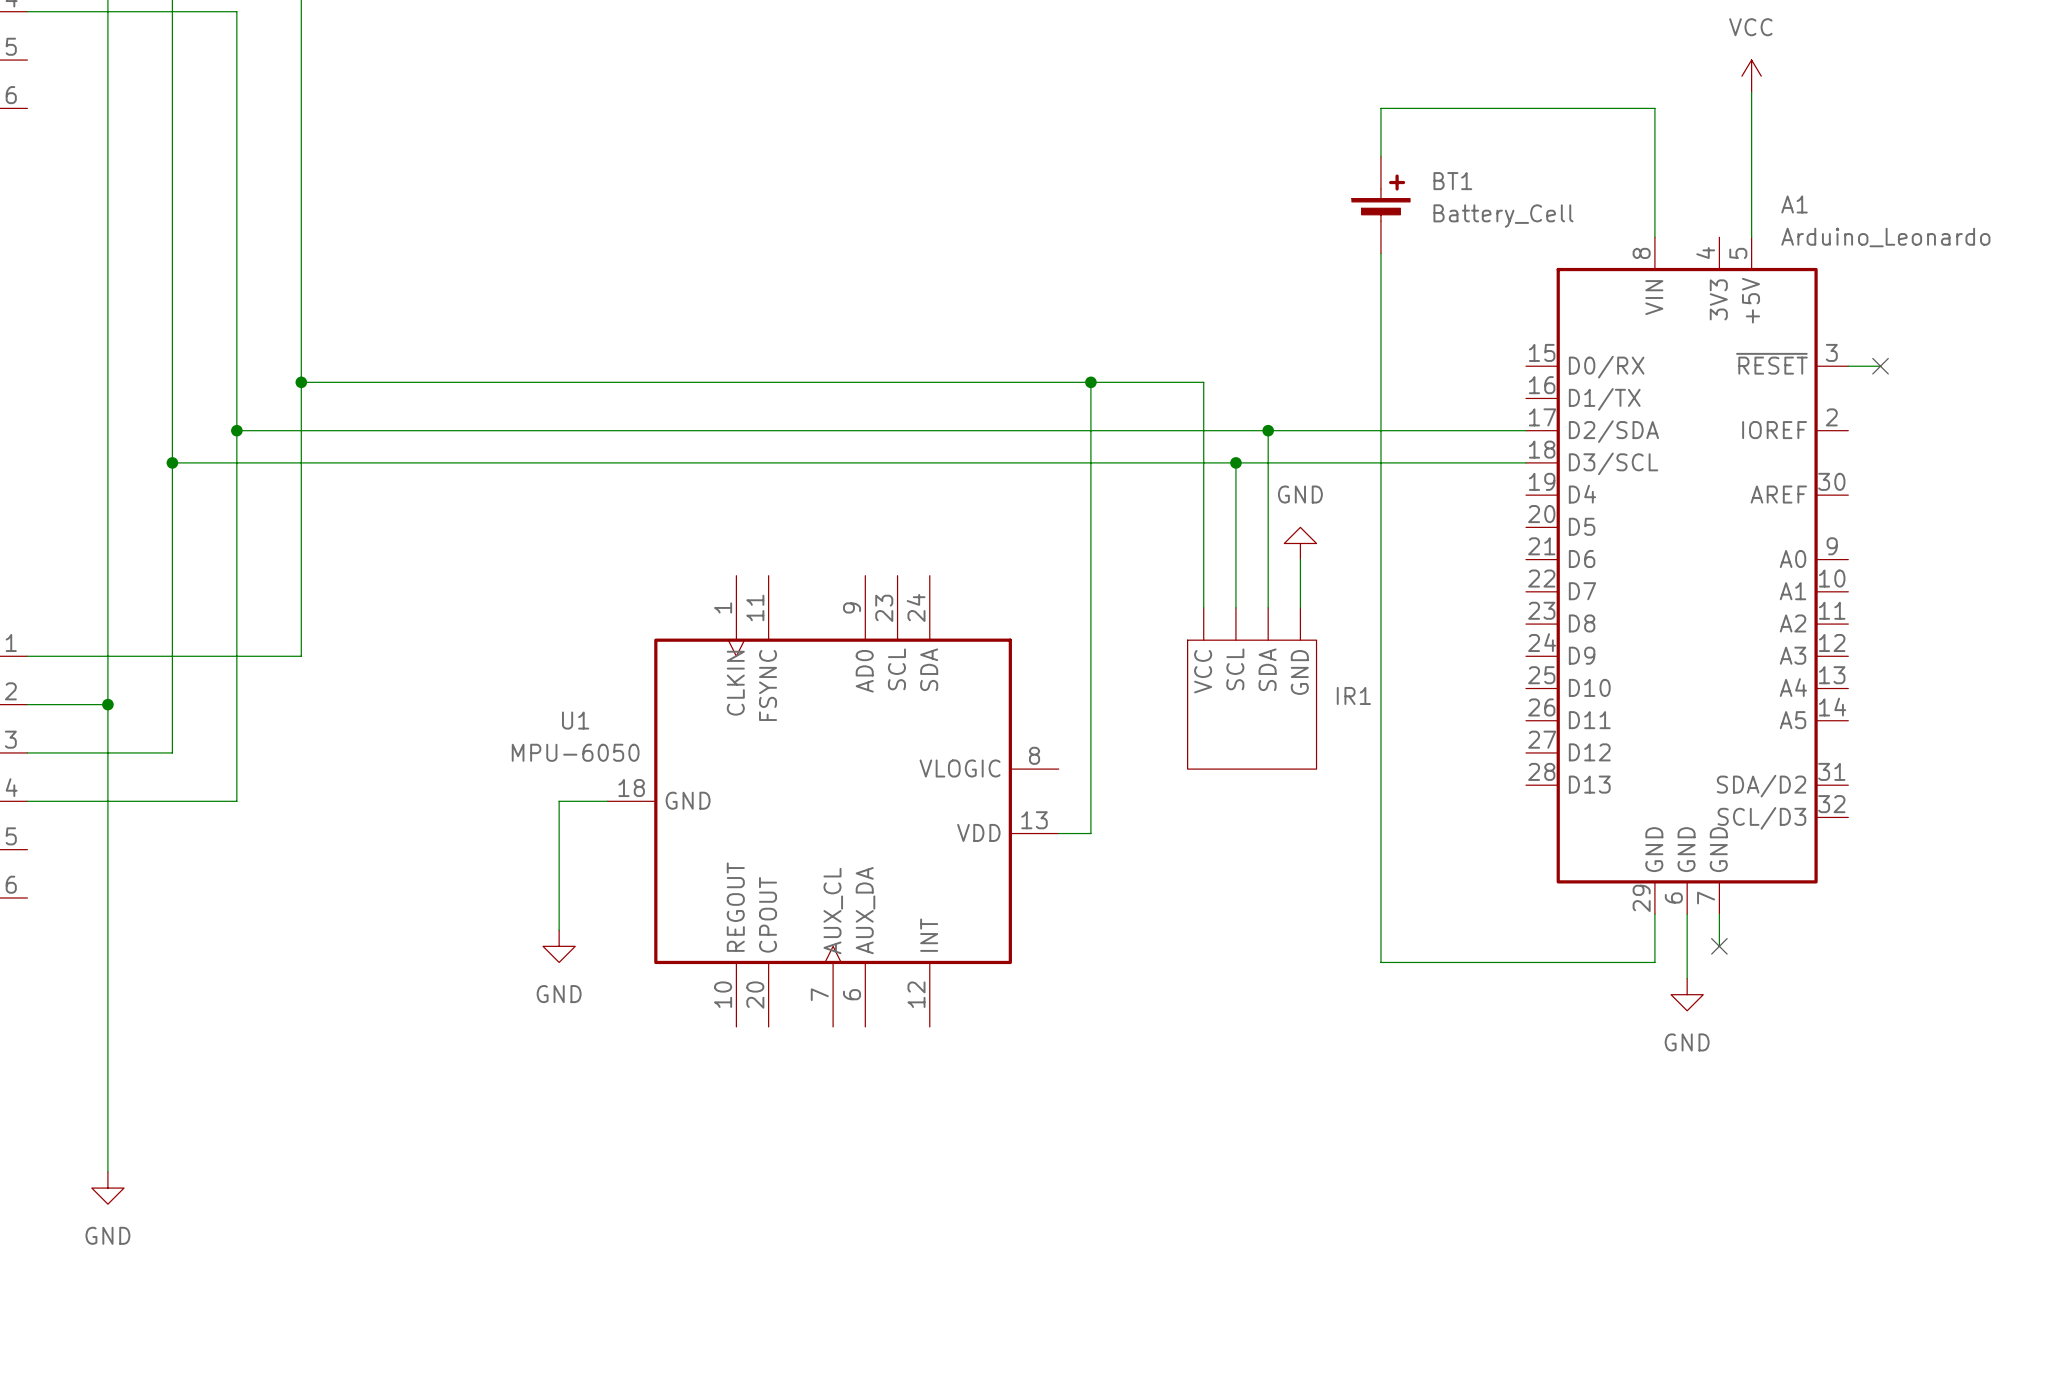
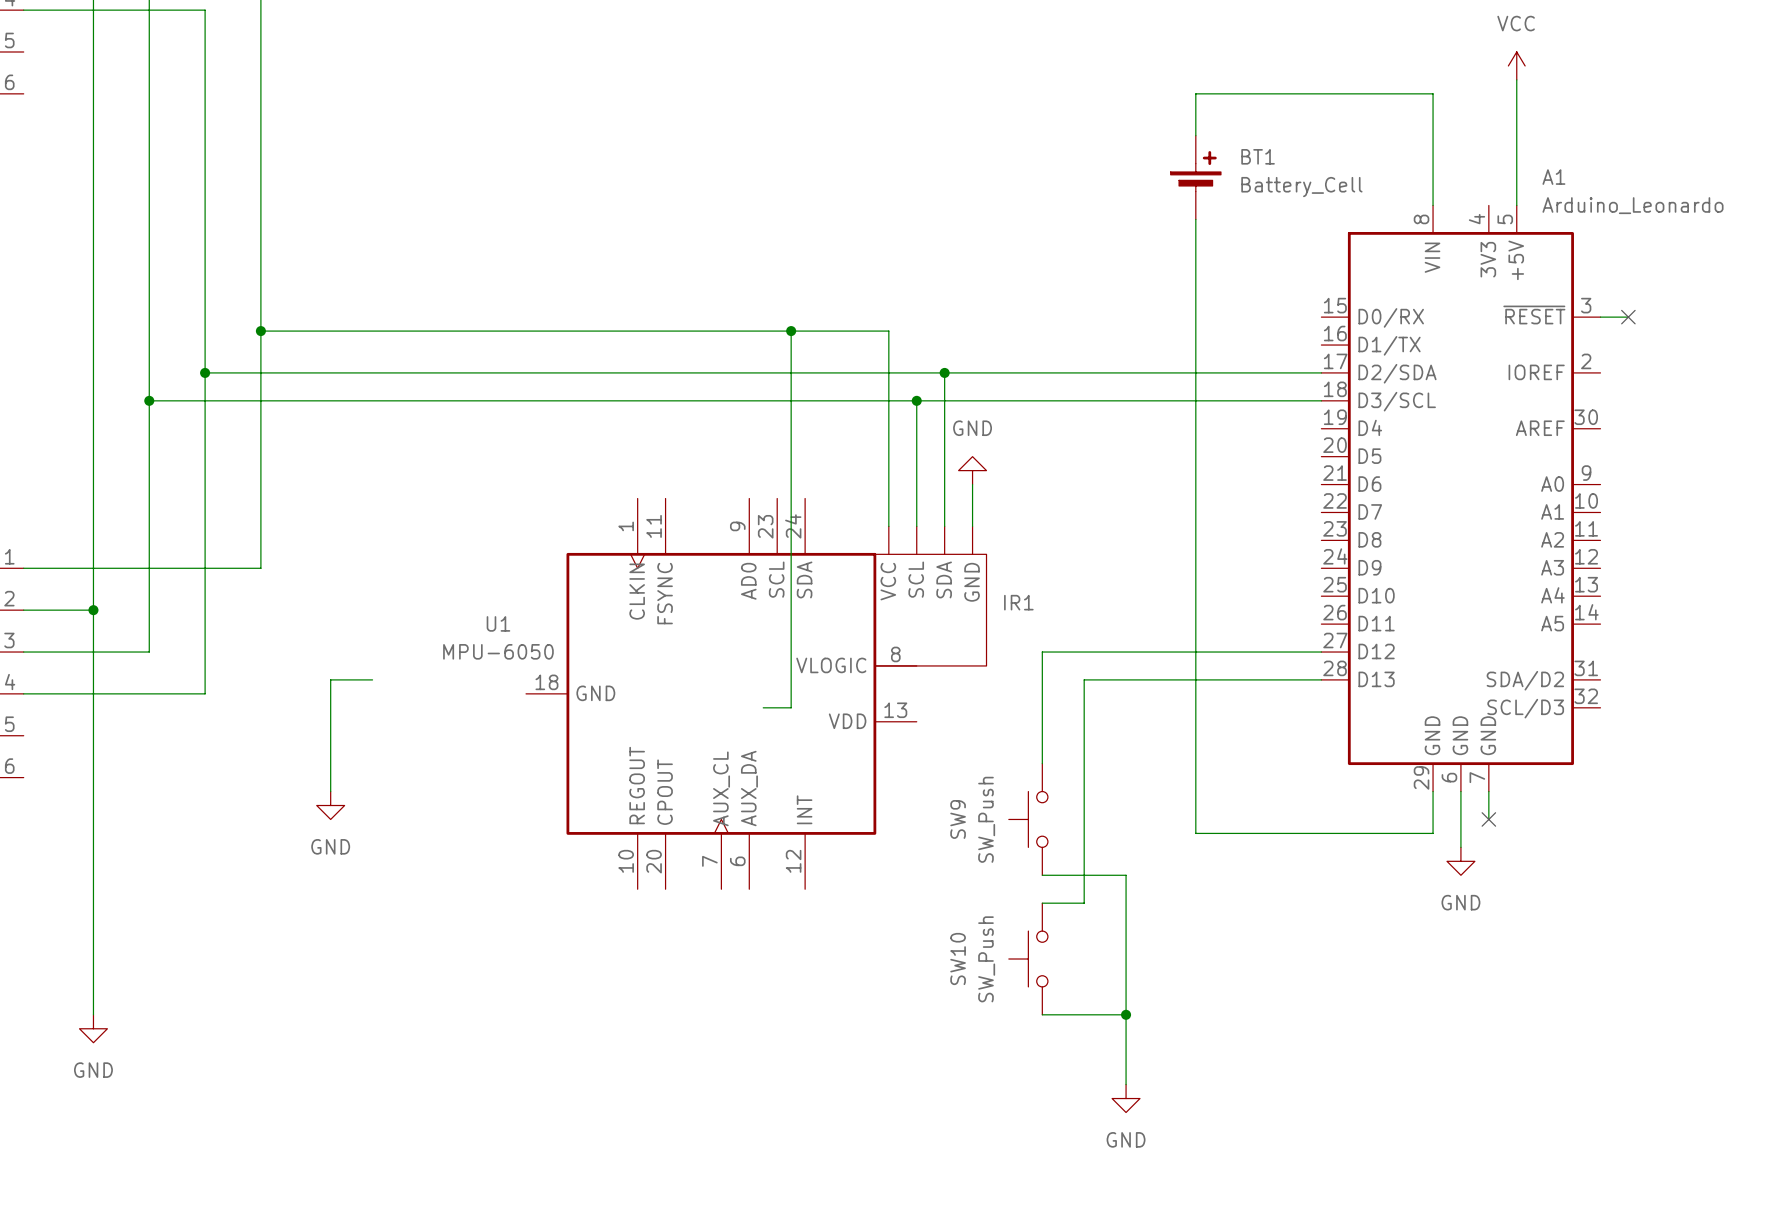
wire: none -> (791, 331) (791, 707) (763, 707)
junction: none -> (791, 331)
wire: (1026, 382) (1203, 382) (1203, 607) -> (888, 331) (888, 526)
wire: (1090, 382) (1090, 430) -> none
junction: (1090, 382) -> none
junction: none -> (944, 372)
wire: (1268, 430) (1268, 607) -> none
junction: (1268, 430) -> none
junction: none -> (916, 400)
wire: (1235, 462) (1235, 607) -> (916, 400) (916, 526)
junction: (1235, 462) -> none
power symbol position: GND (1300, 543) -> GND (972, 470)
wire: (1300, 559) (1300, 607) -> (972, 484) (972, 526)
wire: (1090, 607) (1090, 833) (1058, 833) -> none
IR1 position: (1252, 688) -> (930, 596)
wire: none -> (1321, 652) (1042, 652) (1042, 763)
wire: none -> (1321, 679) (1084, 679) (1084, 903) (1042, 903)
wire: (607, 801) (559, 801) (559, 930) -> (372, 679) (330, 679) (330, 791)
power symbol position: GND (559, 946) -> GND (330, 805)
SW9: none -> SW_Push (1028, 819)
wire: none -> (1042, 875) (1126, 875) (1126, 1084)
SW10: none -> SW_Push (1028, 959)
wire: none -> (1042, 1014) (1126, 1014)
junction: none -> (1126, 1014)
power symbol: none -> GND (1126, 1098)

